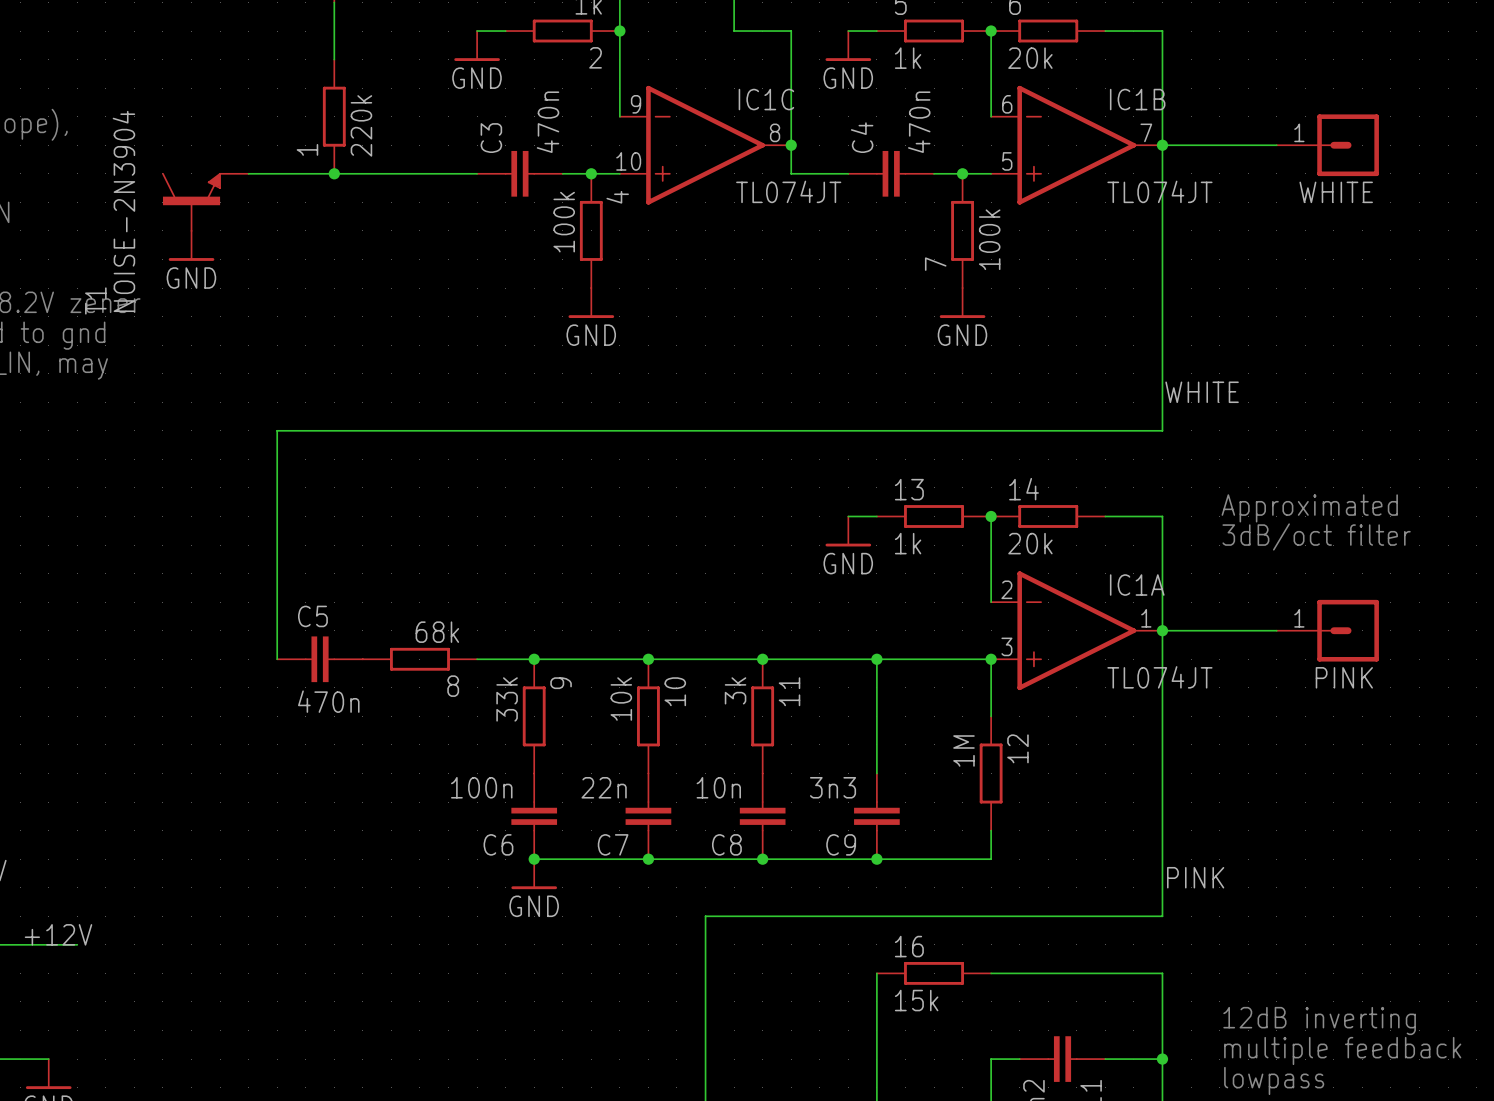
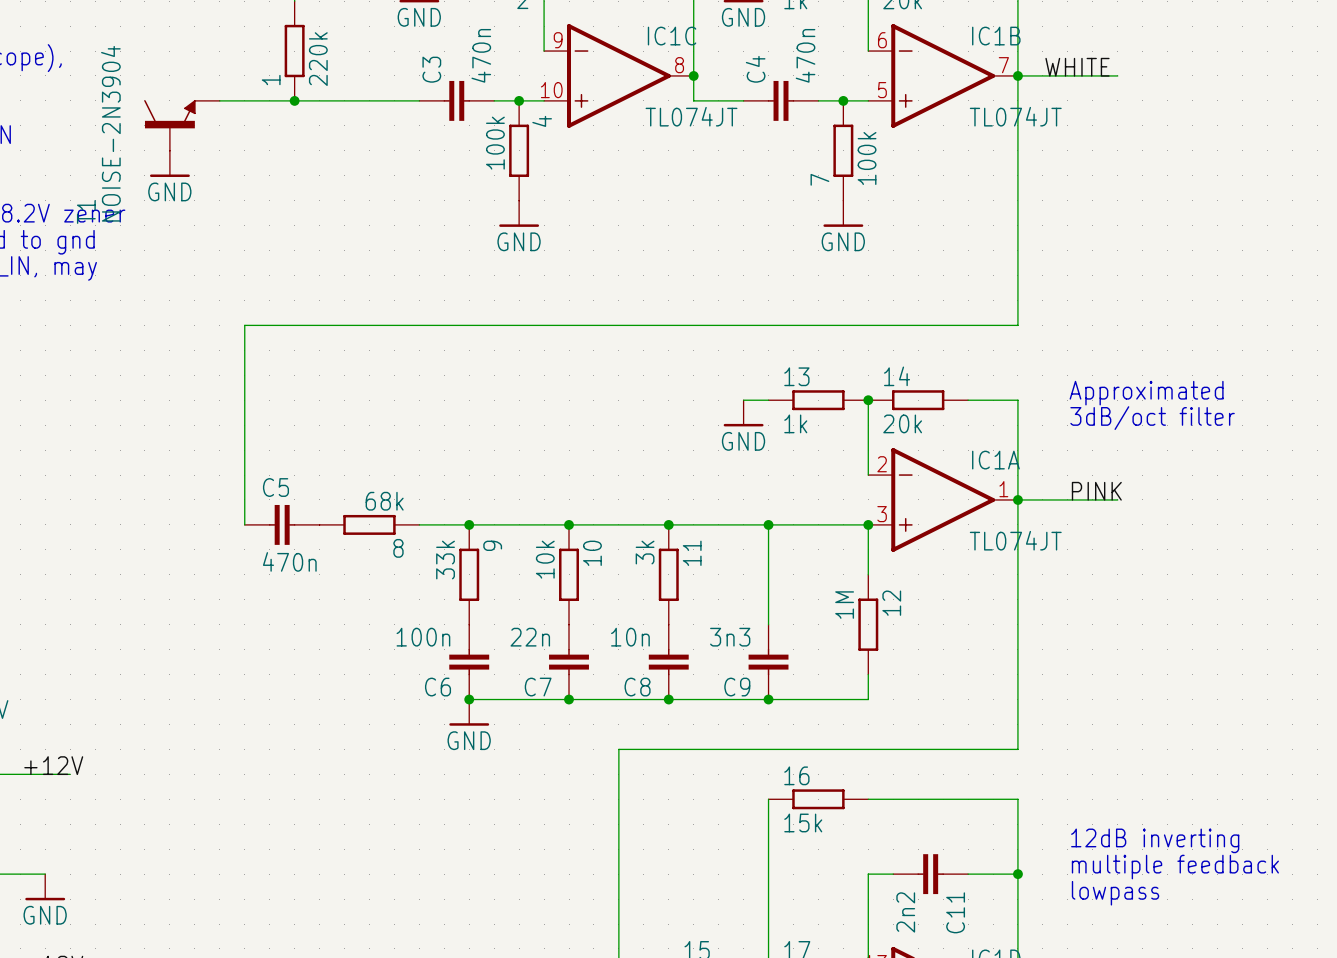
WHITE: (1327, 145) -> none
label position: WHITE (1202, 392) -> WHITE (1077, 67)
PINK: (1327, 630) -> none
label position: PINK (1195, 877) -> PINK (1096, 491)

